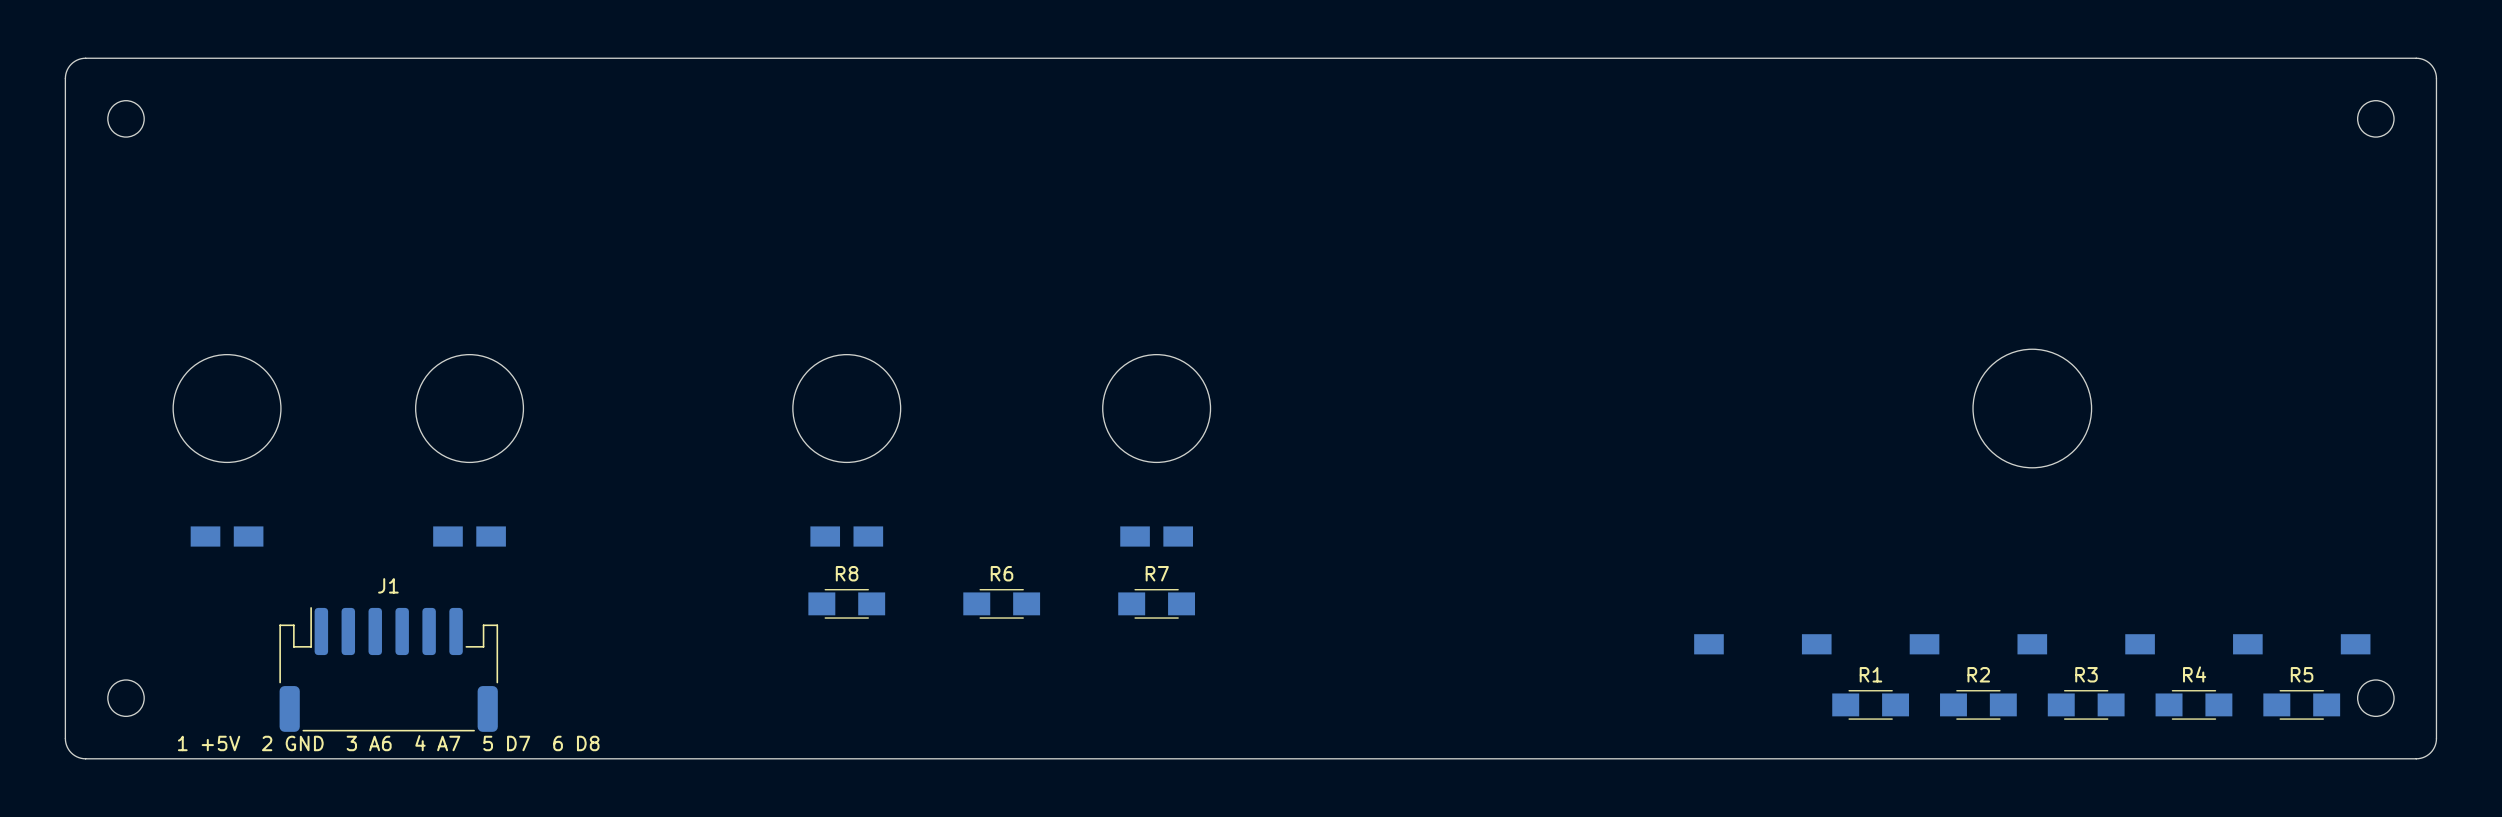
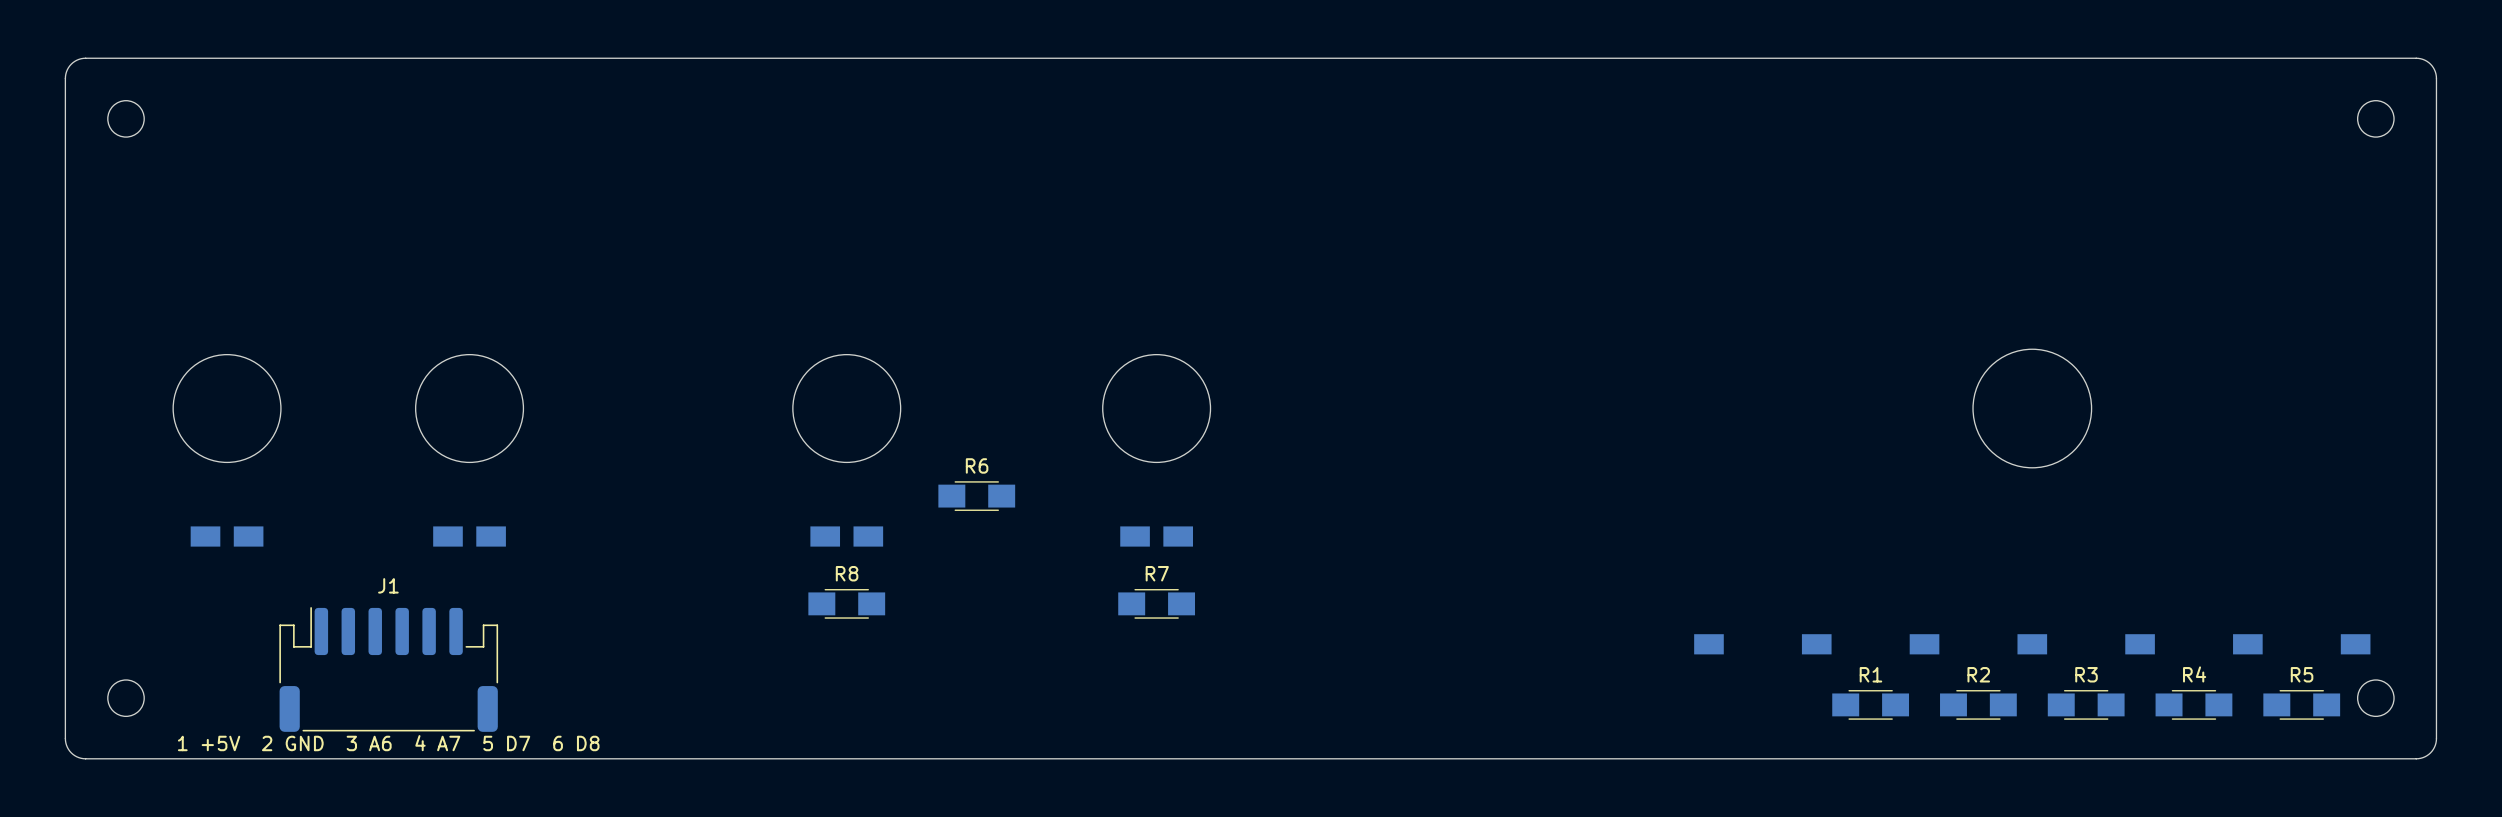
R6 position: (1001, 603) -> (976, 496)

